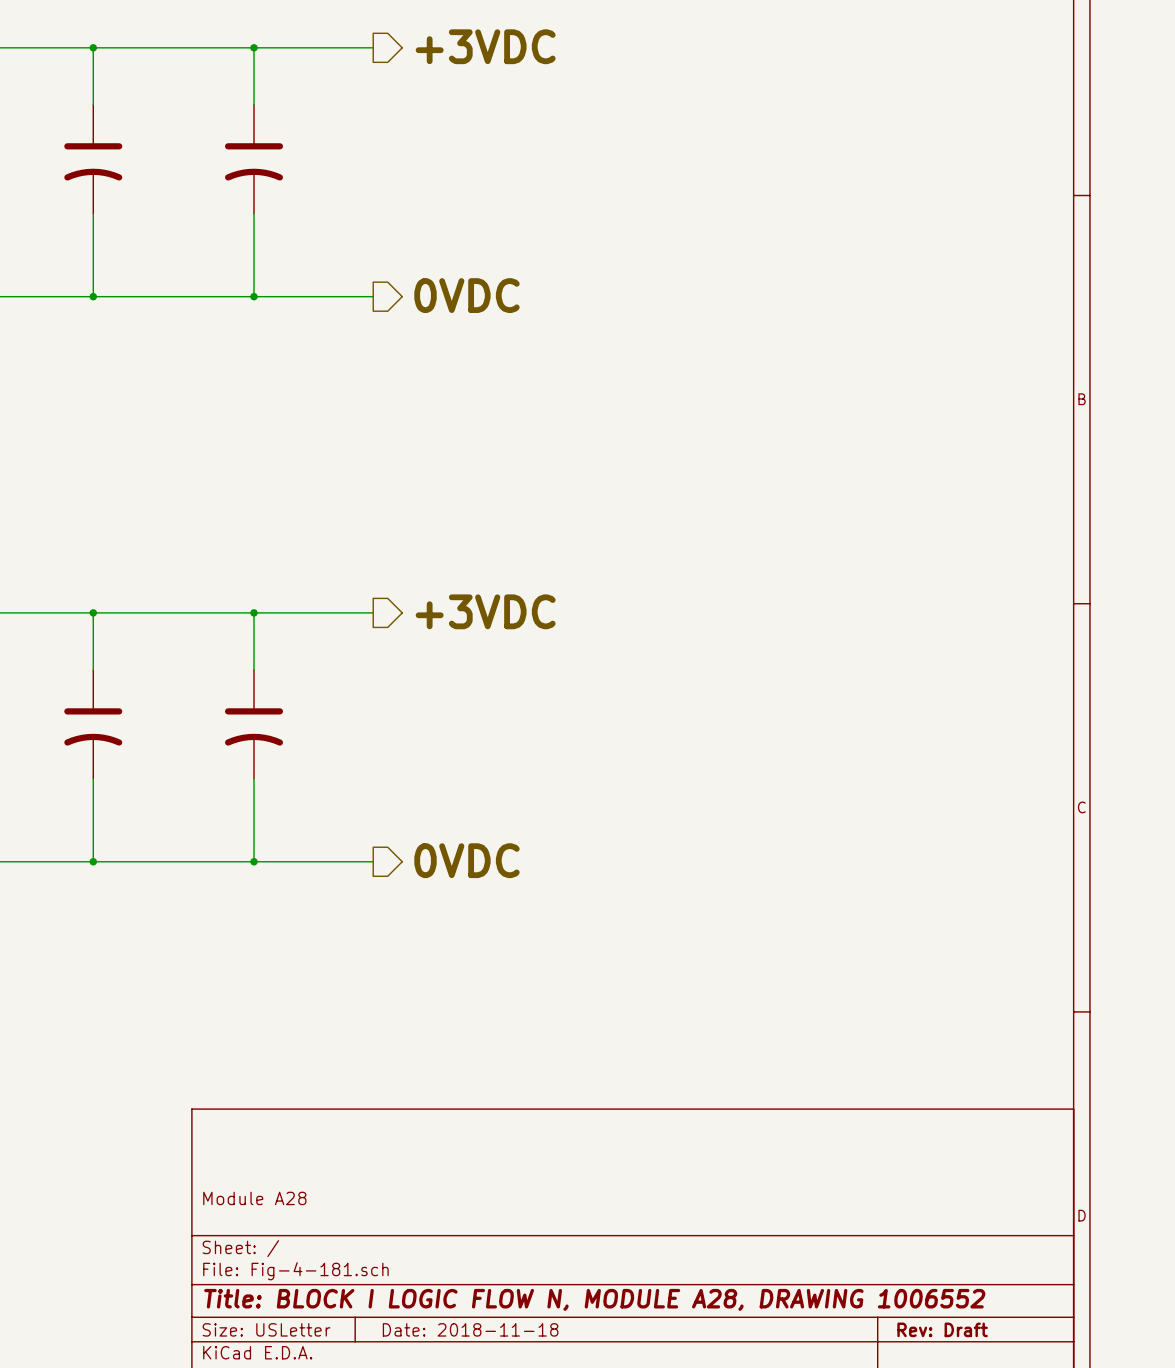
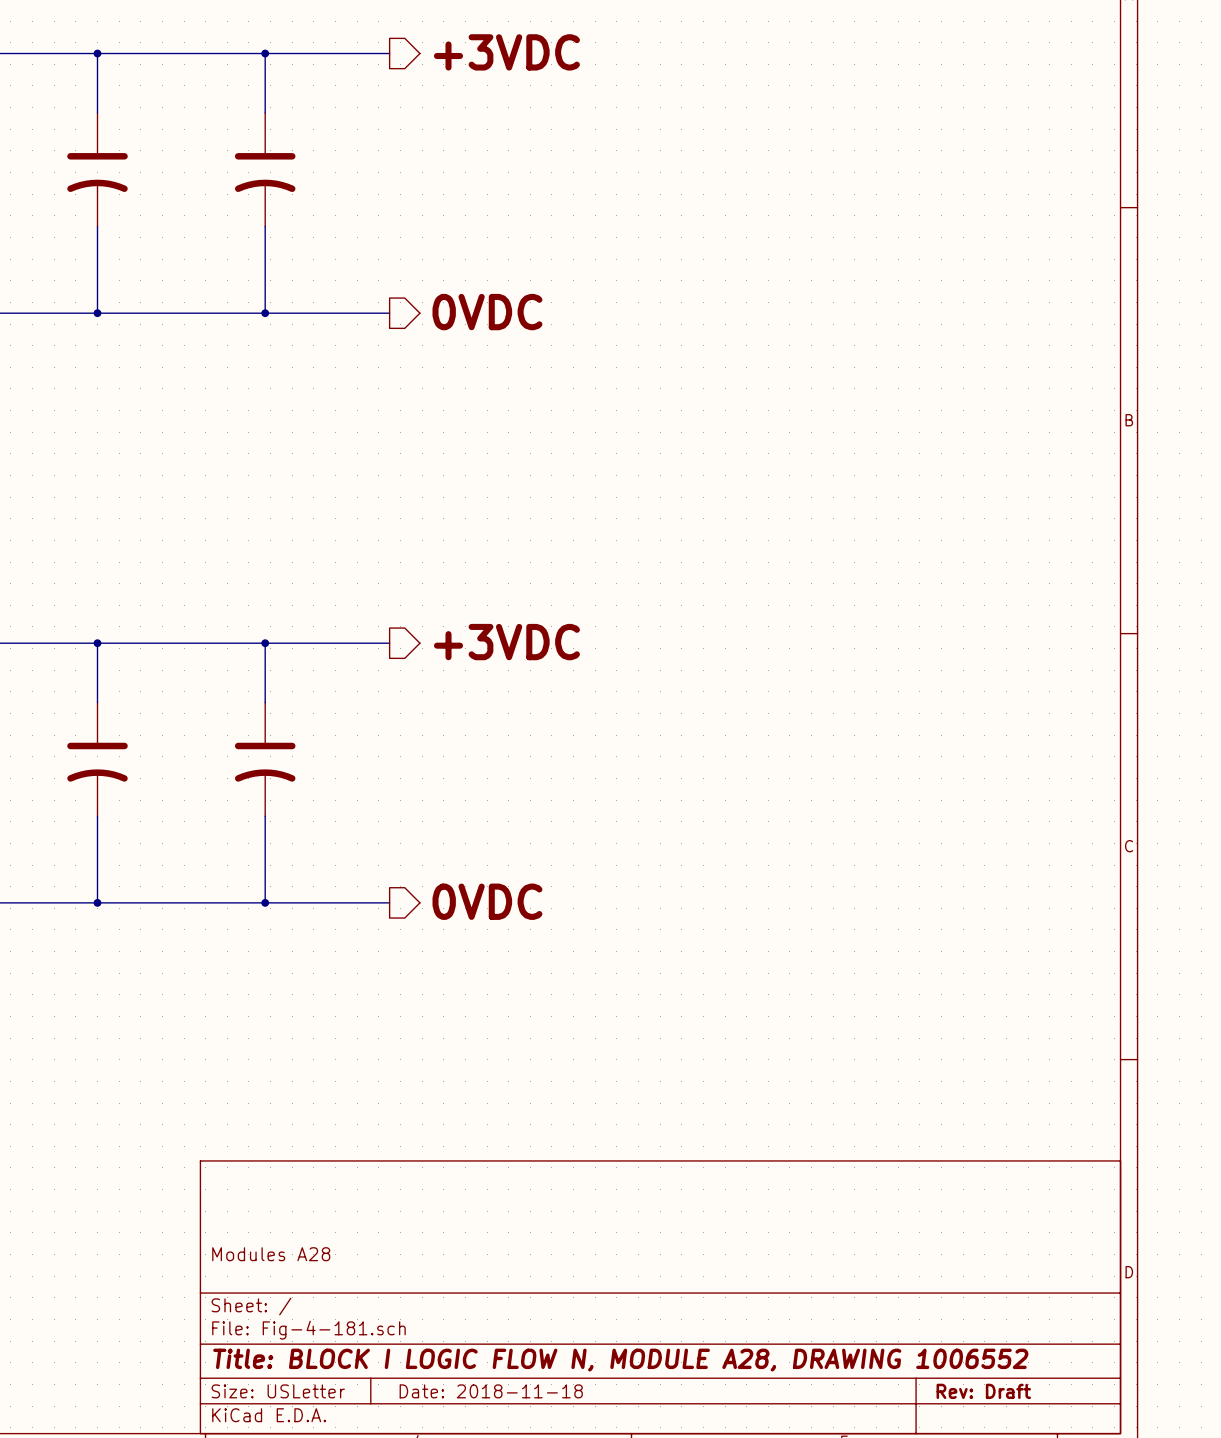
title block: Module A28 (254, 1198) -> Modules A28 (271, 1254)

